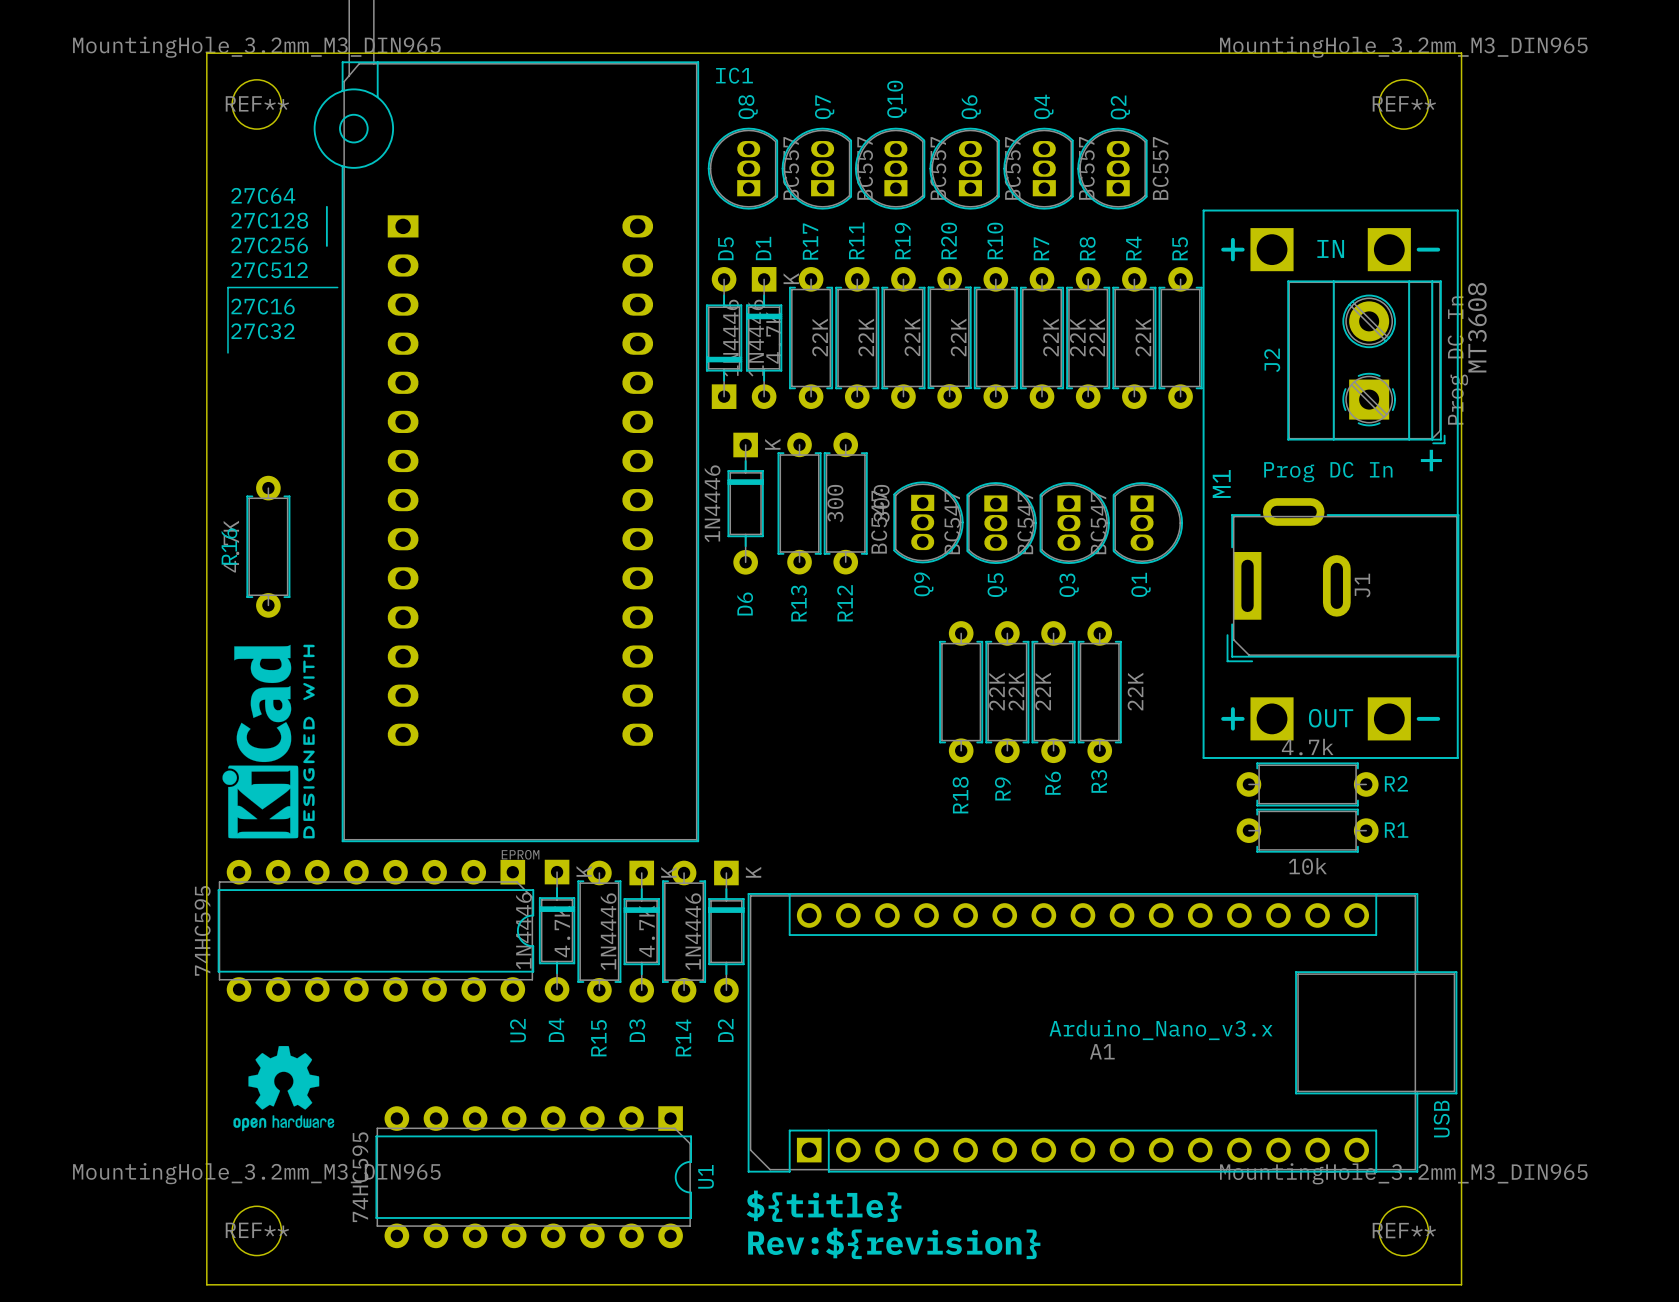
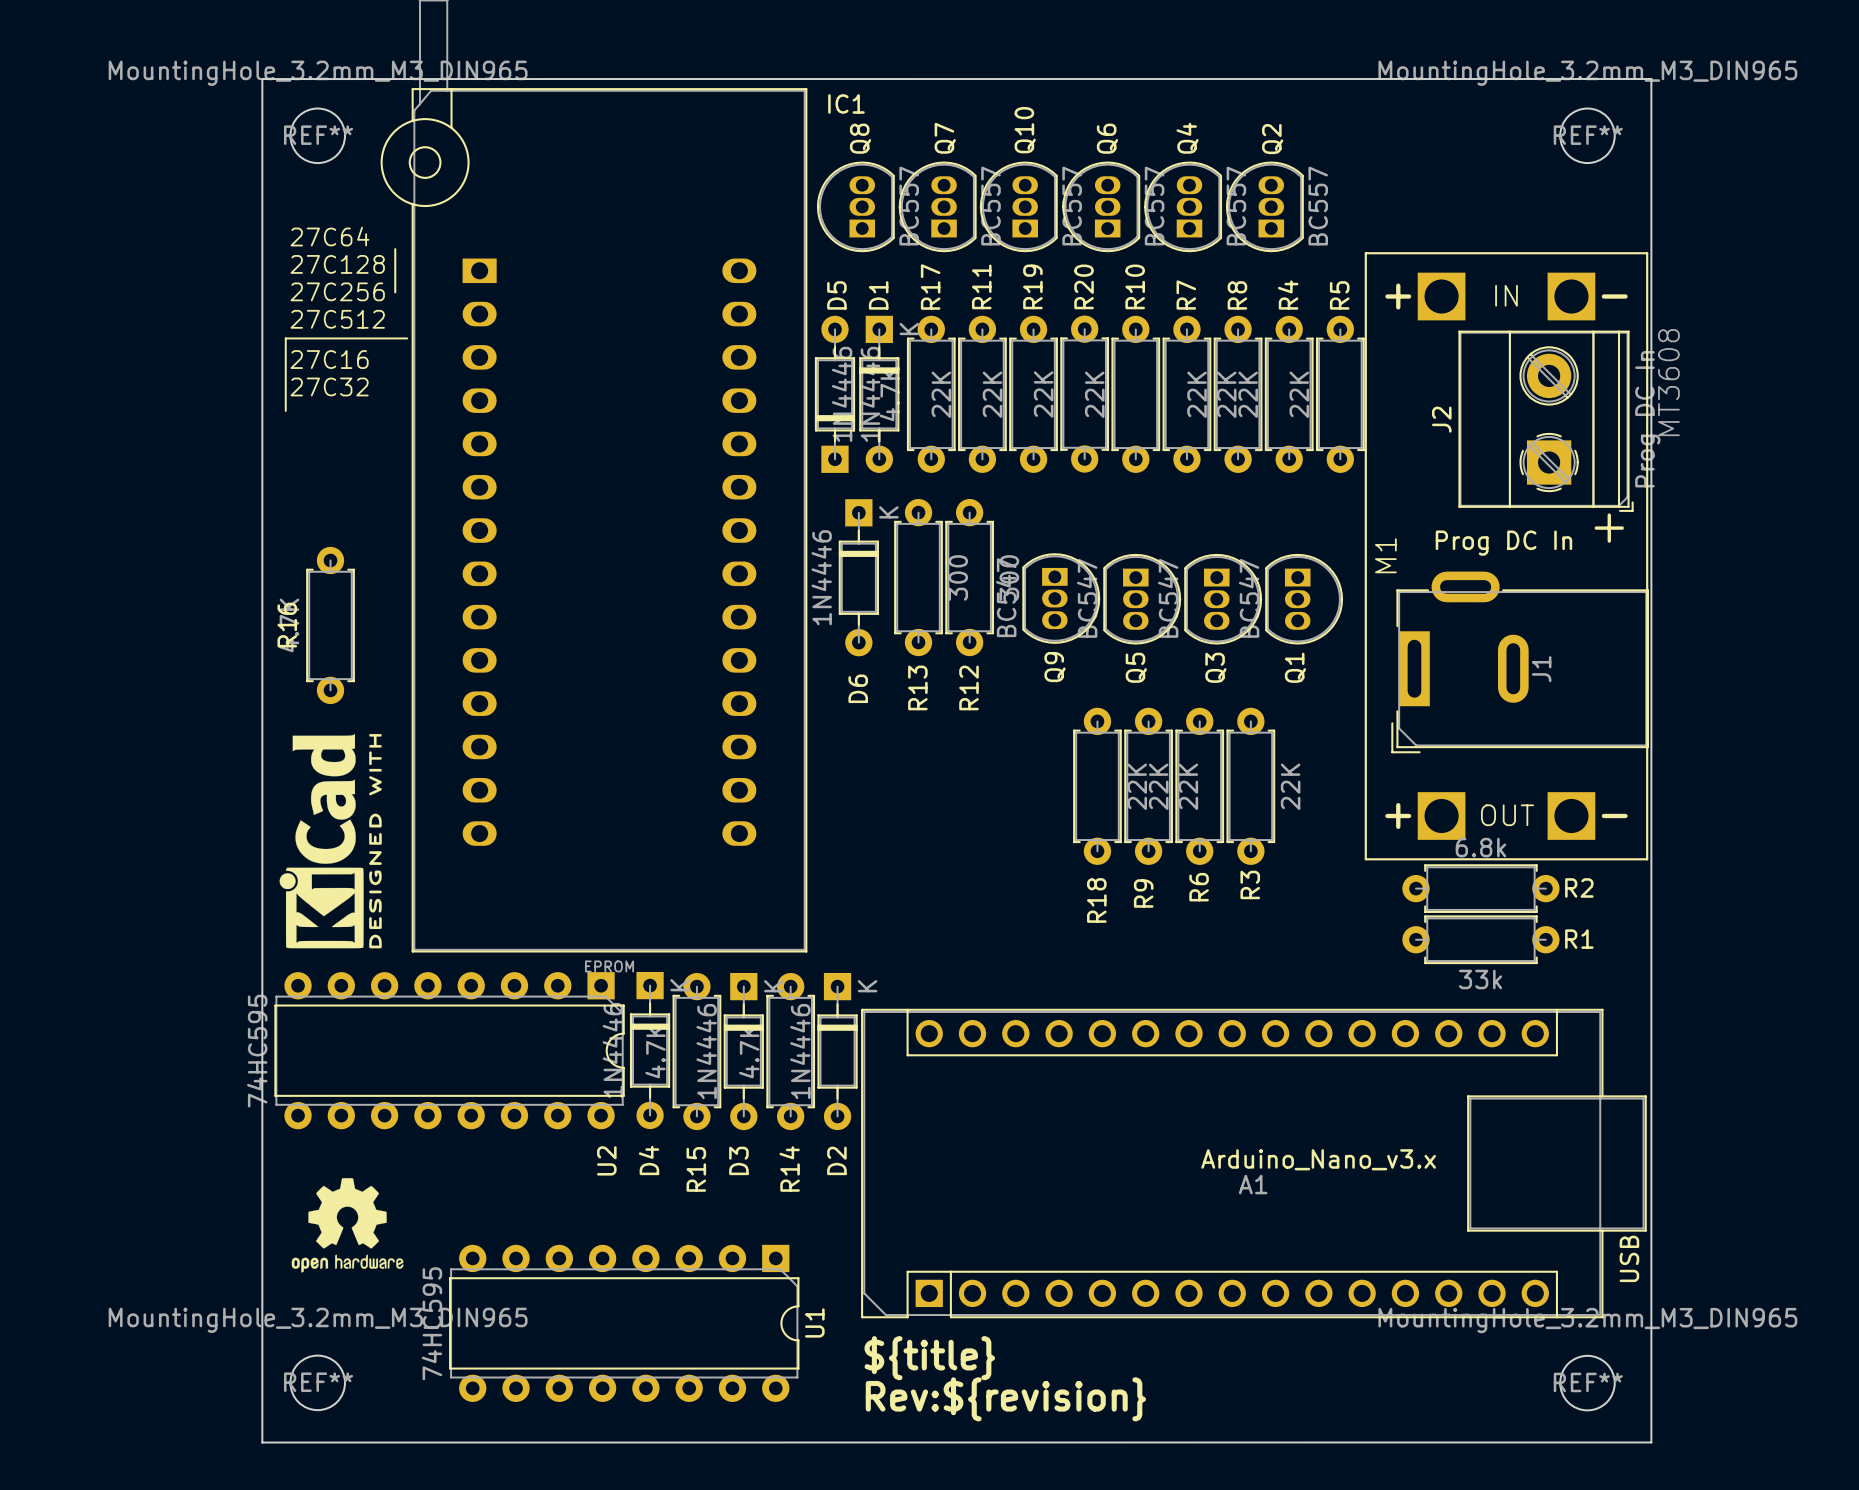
R2 value: 4.7k (1307, 747) -> 6.8k (1480, 847)
R1 value: 10k (1307, 866) -> 33k (1480, 979)

